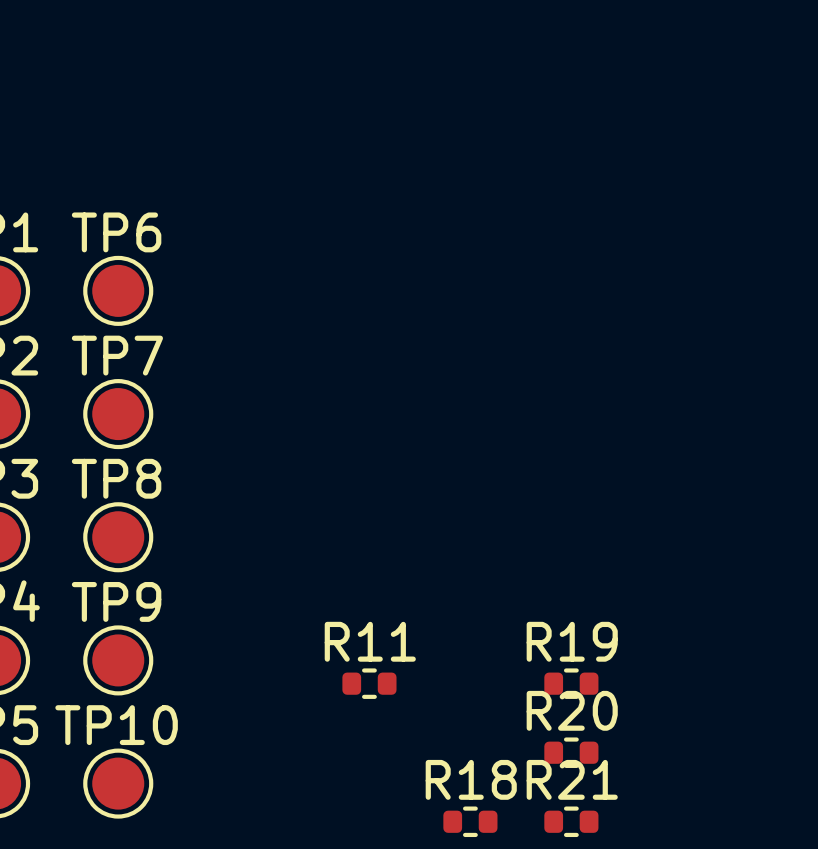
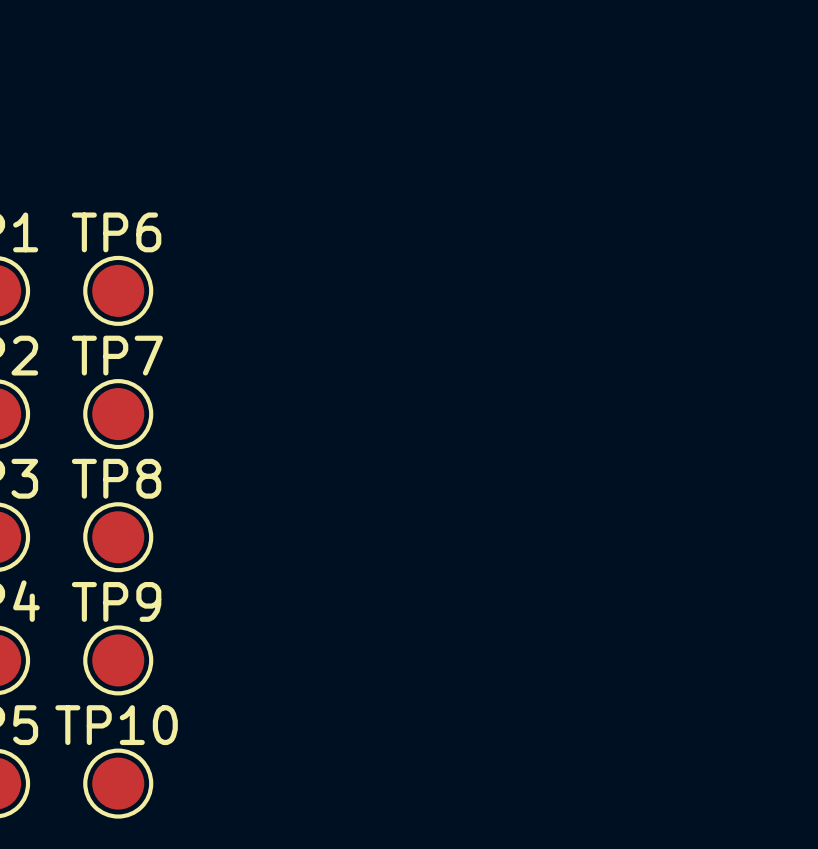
R11: (369, 683) -> none
R19: (571, 683) -> none
R20: (571, 752) -> none
R18: (470, 821) -> none
R21: (571, 821) -> none

